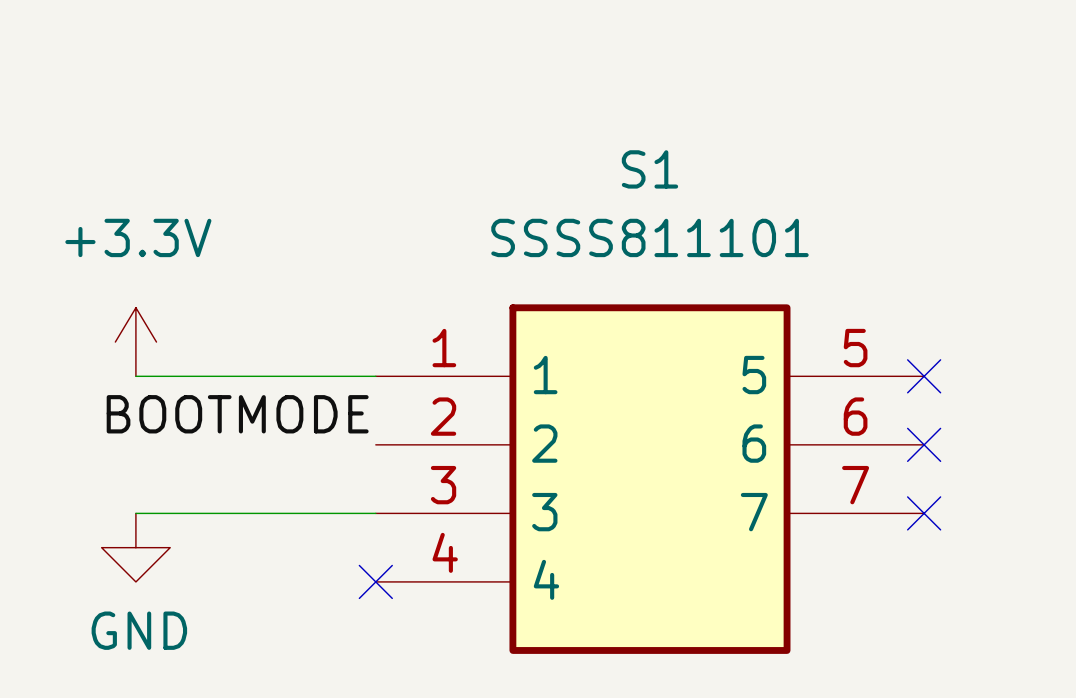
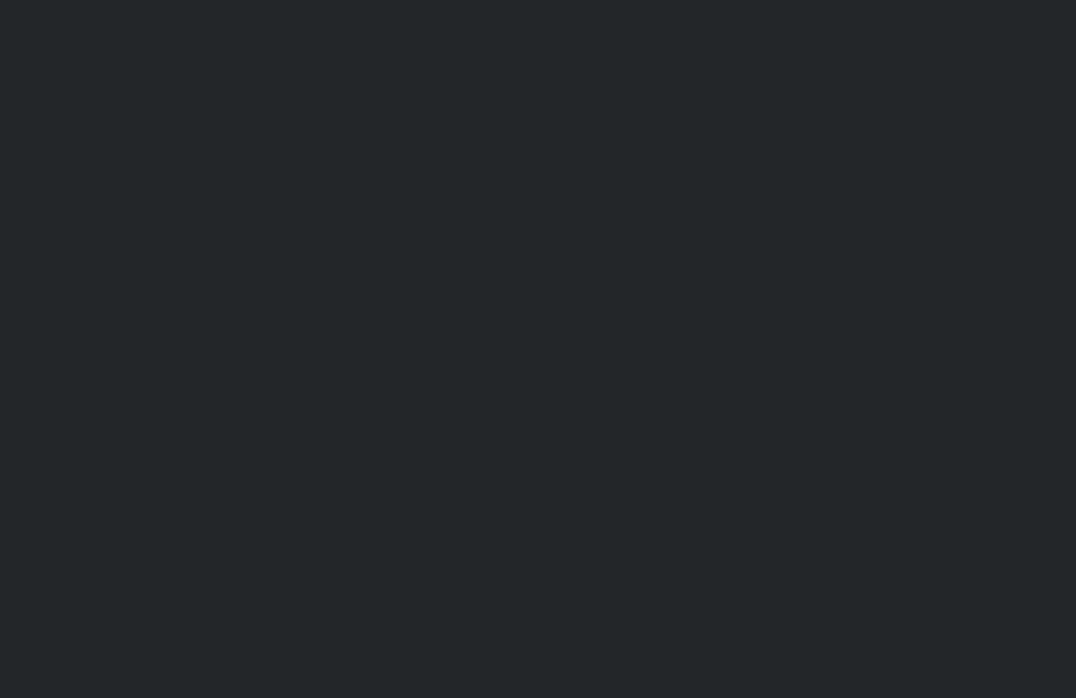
power symbol: +3.3V (135, 342) -> none
wire: (135, 376) (375, 376) -> none
no-connect mark: (924, 376) -> none
label: BOOTMODE (237, 414) -> none
no-connect mark: (924, 444) -> none
S1: SSSS811101 (649, 479) -> none
wire: (135, 513) (375, 513) -> none
no-connect mark: (924, 513) -> none
power symbol: GND (135, 547) -> none
no-connect mark: (375, 581) -> none

